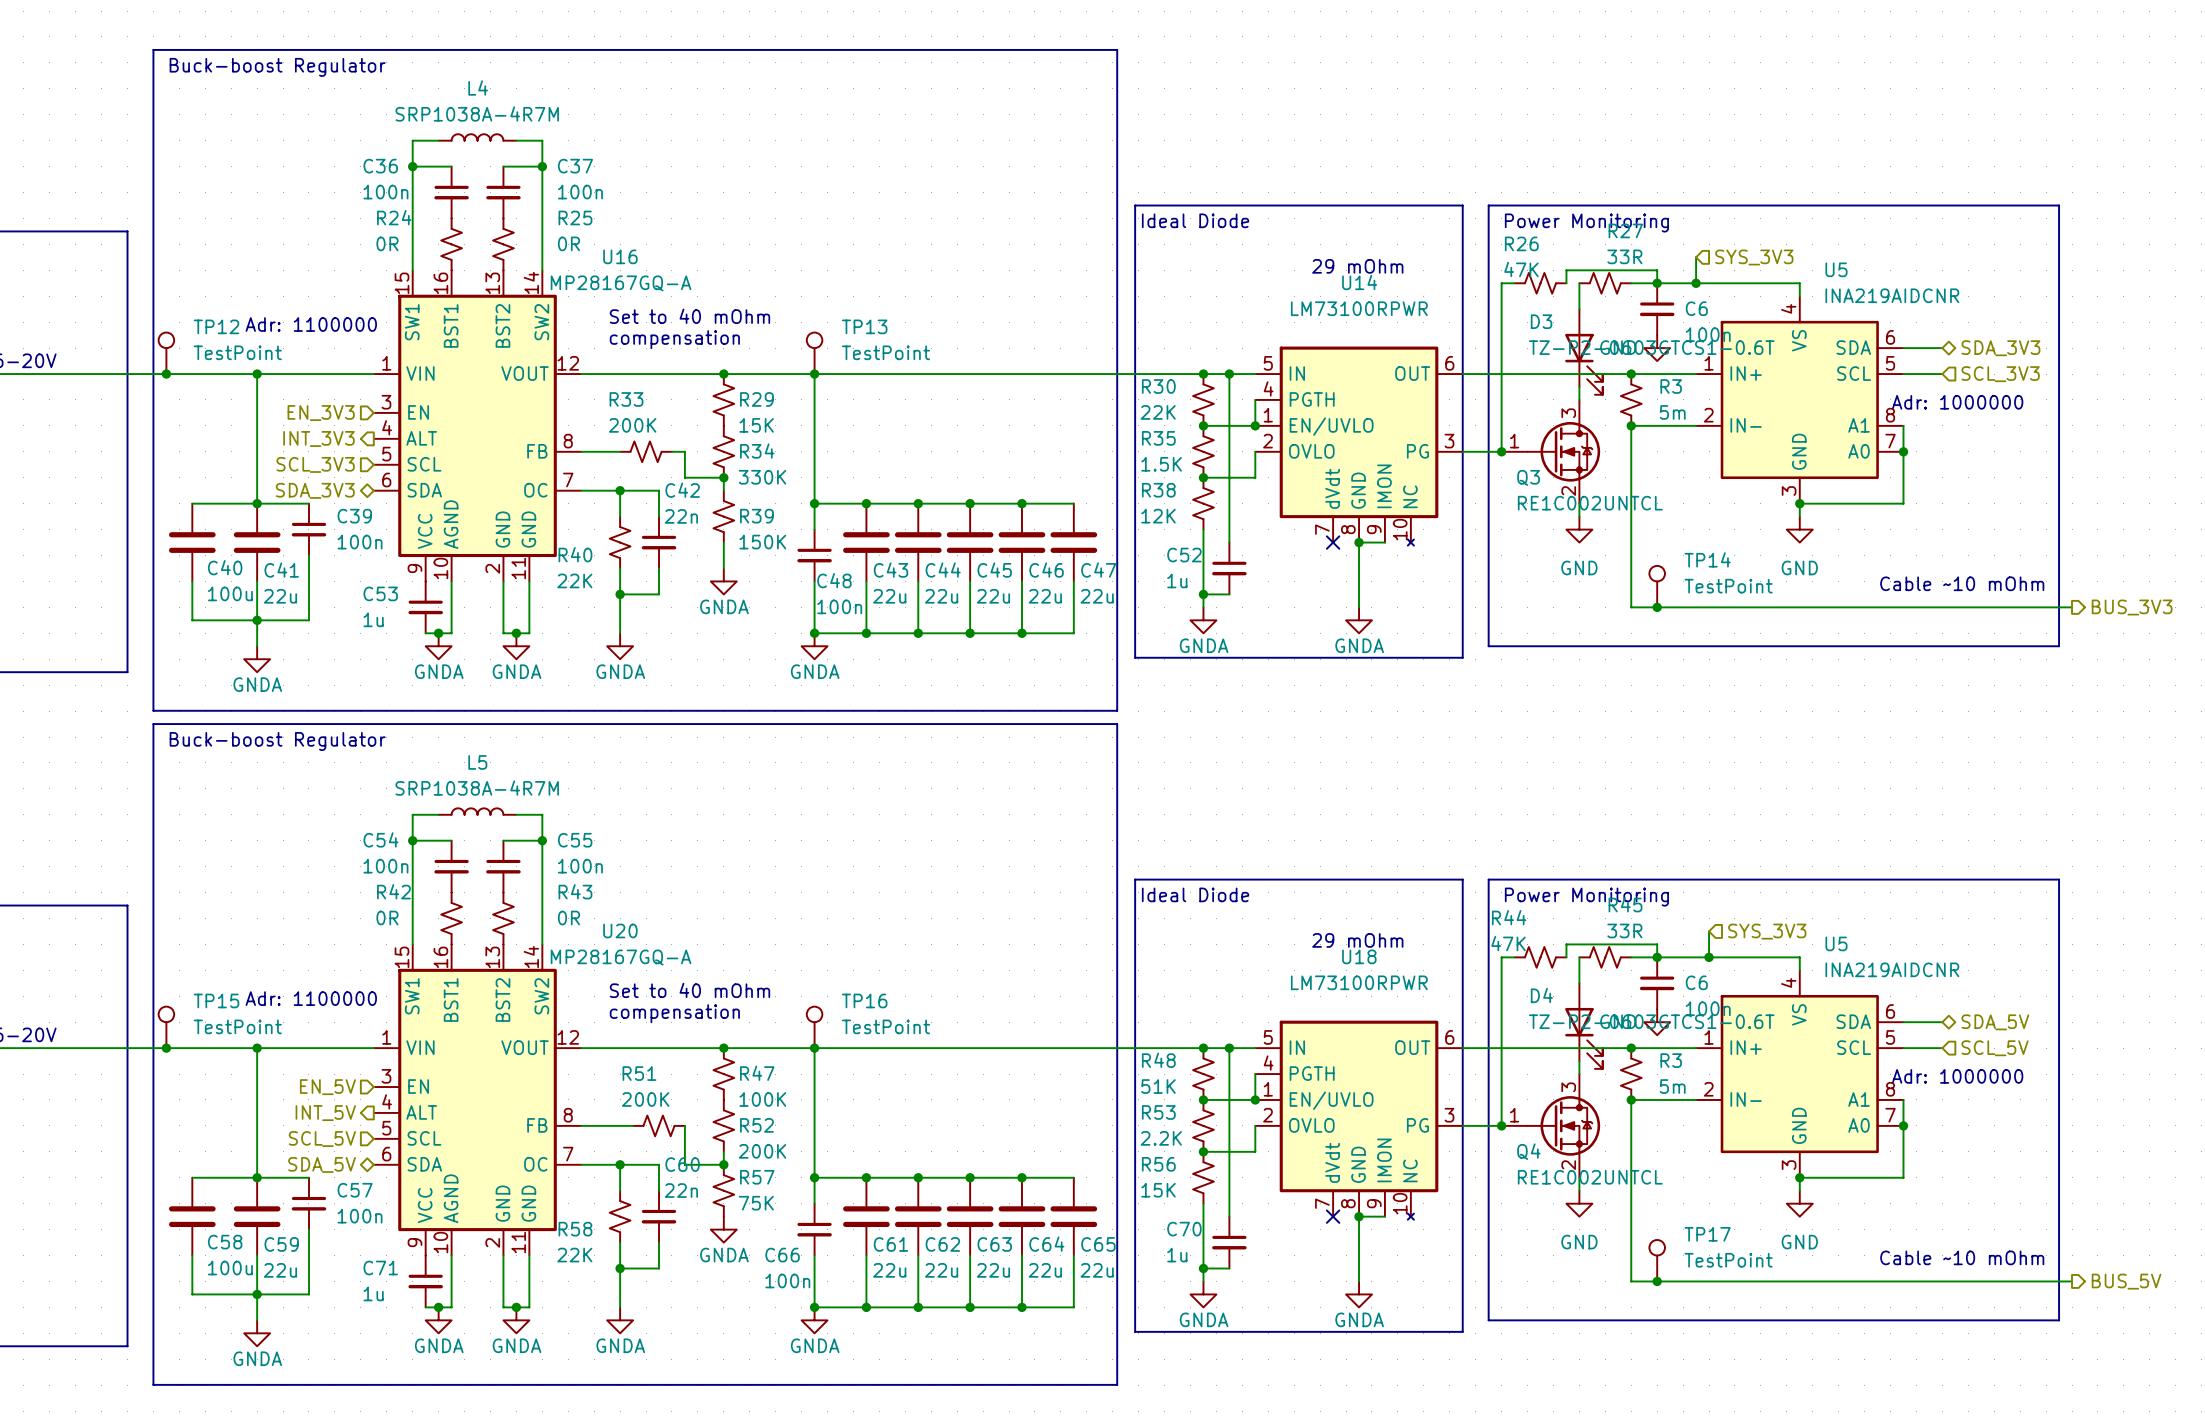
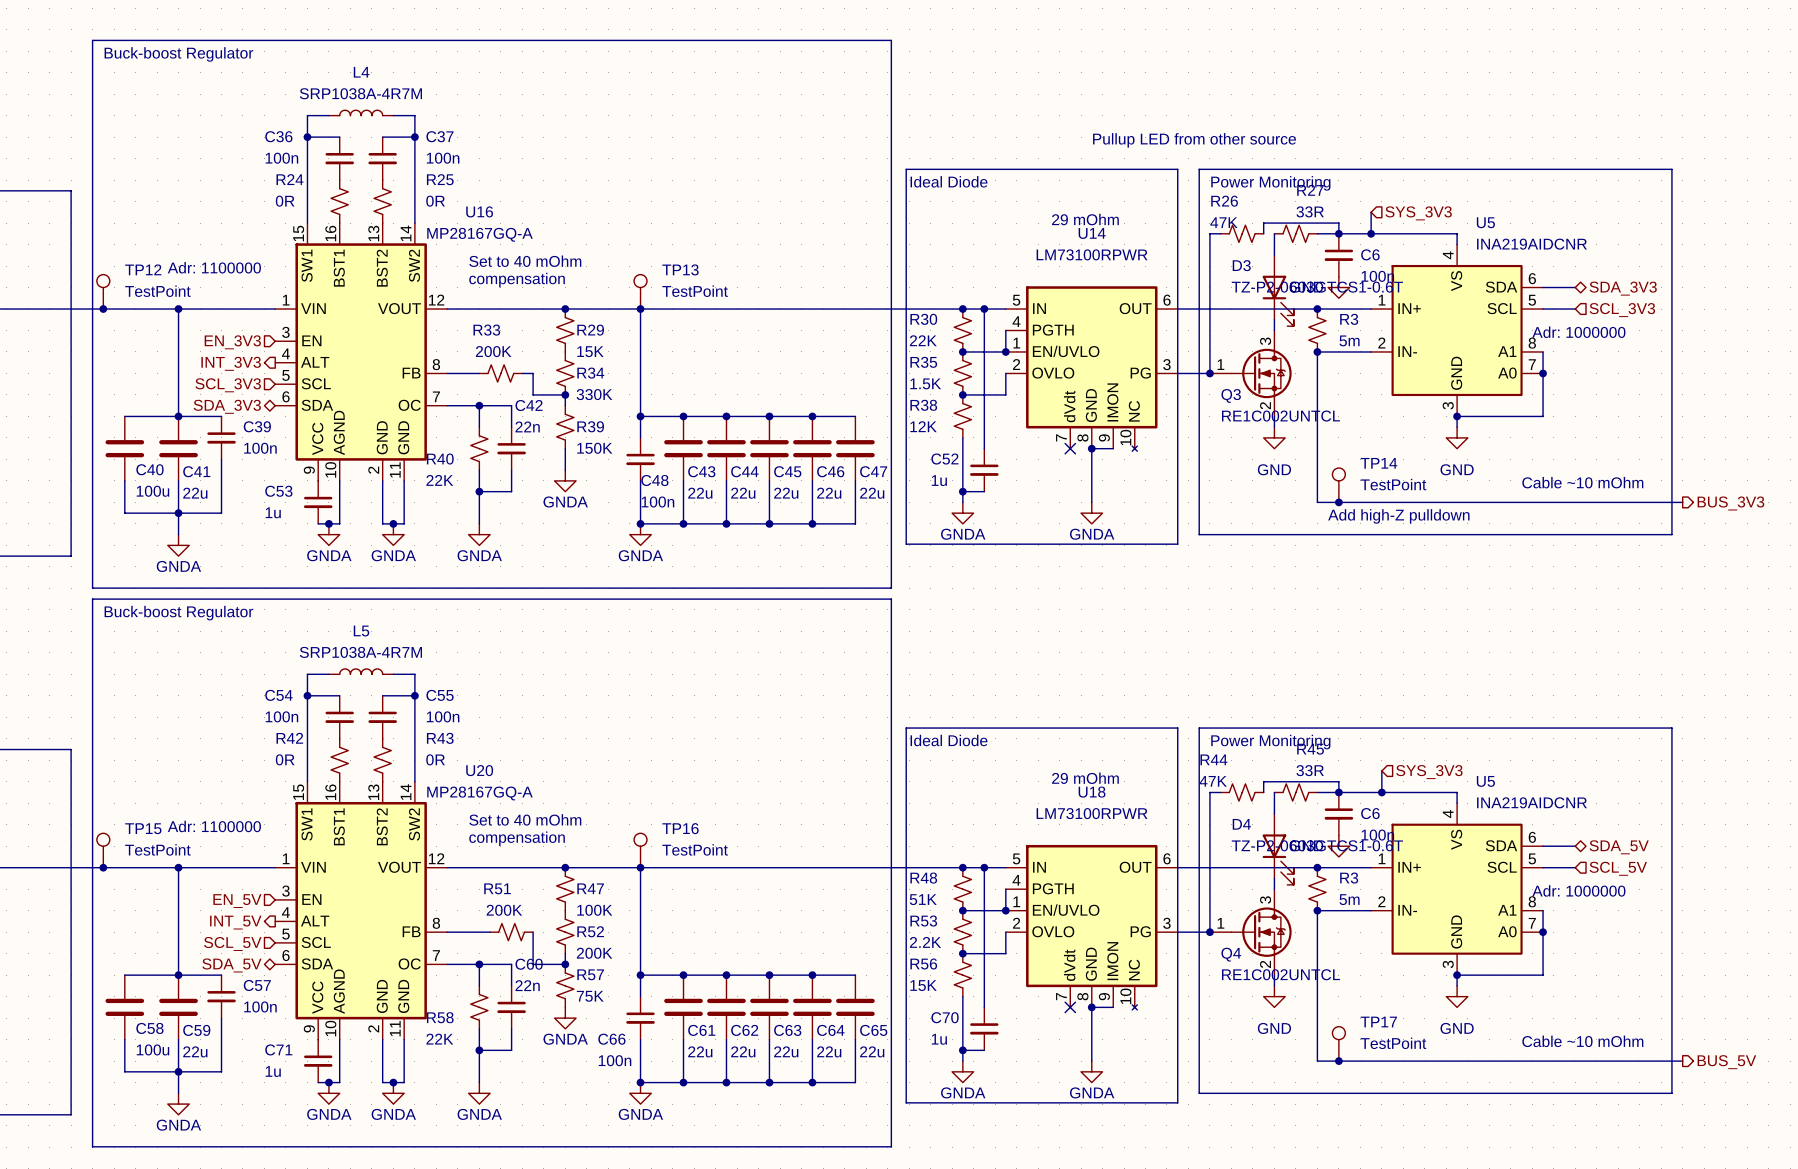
text: none -> Pullup LED from other source (1194, 140)
text: none -> Add high-Z pulldown (1398, 516)

